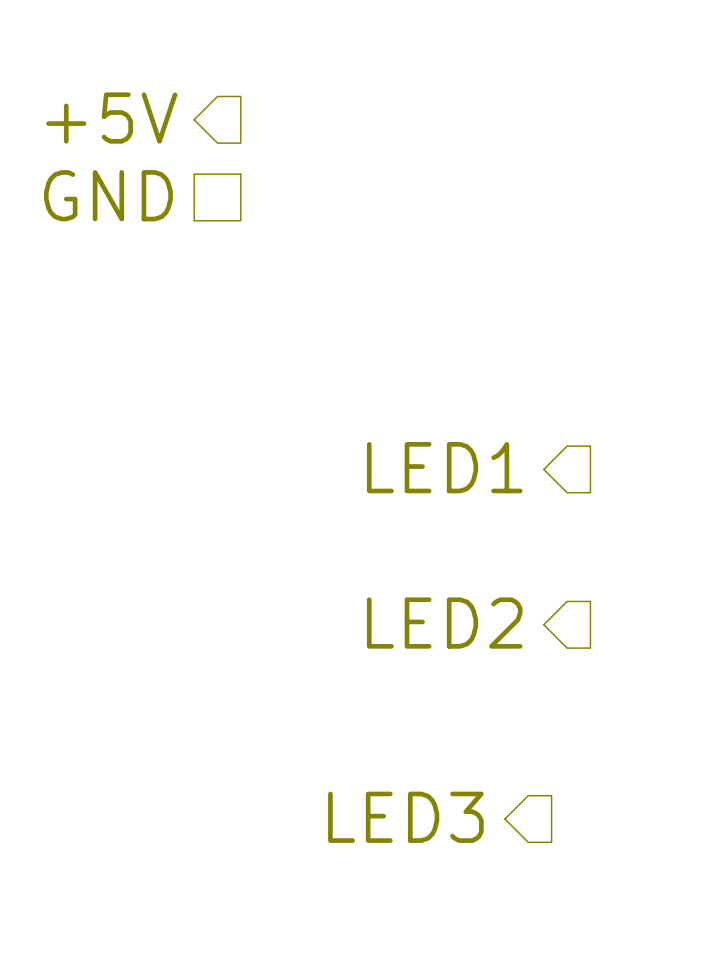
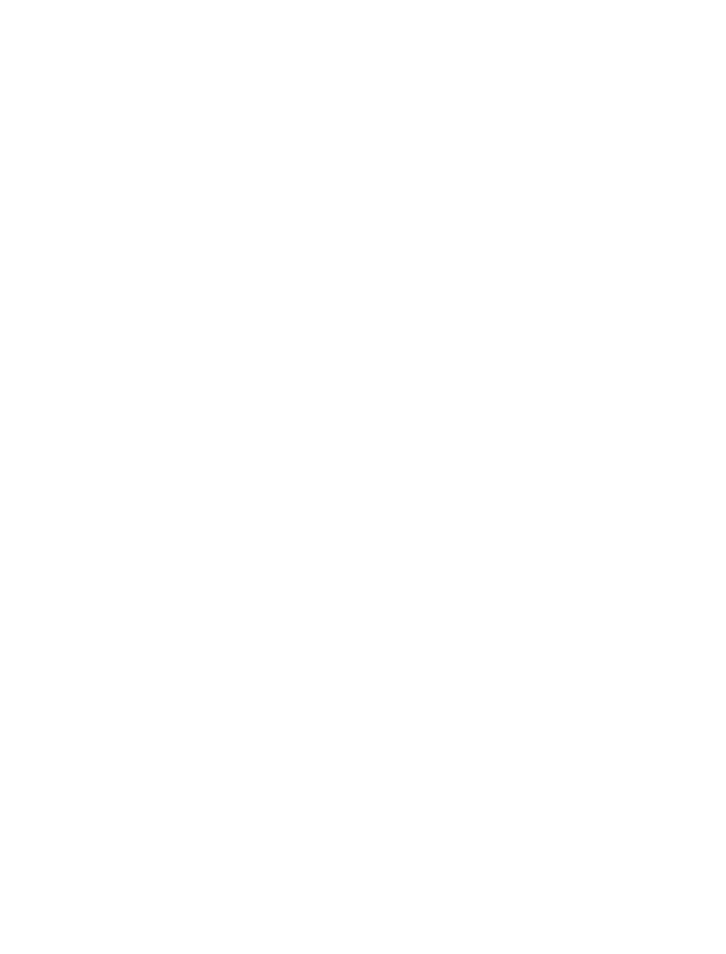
hierarchical label: +5V (111, 118) -> none
hierarchical label: GND (108, 195) -> none
hierarchical label: LED1 (444, 467) -> none
hierarchical label: LED2 (444, 623) -> none
hierarchical label: LED3 (405, 817) -> none

